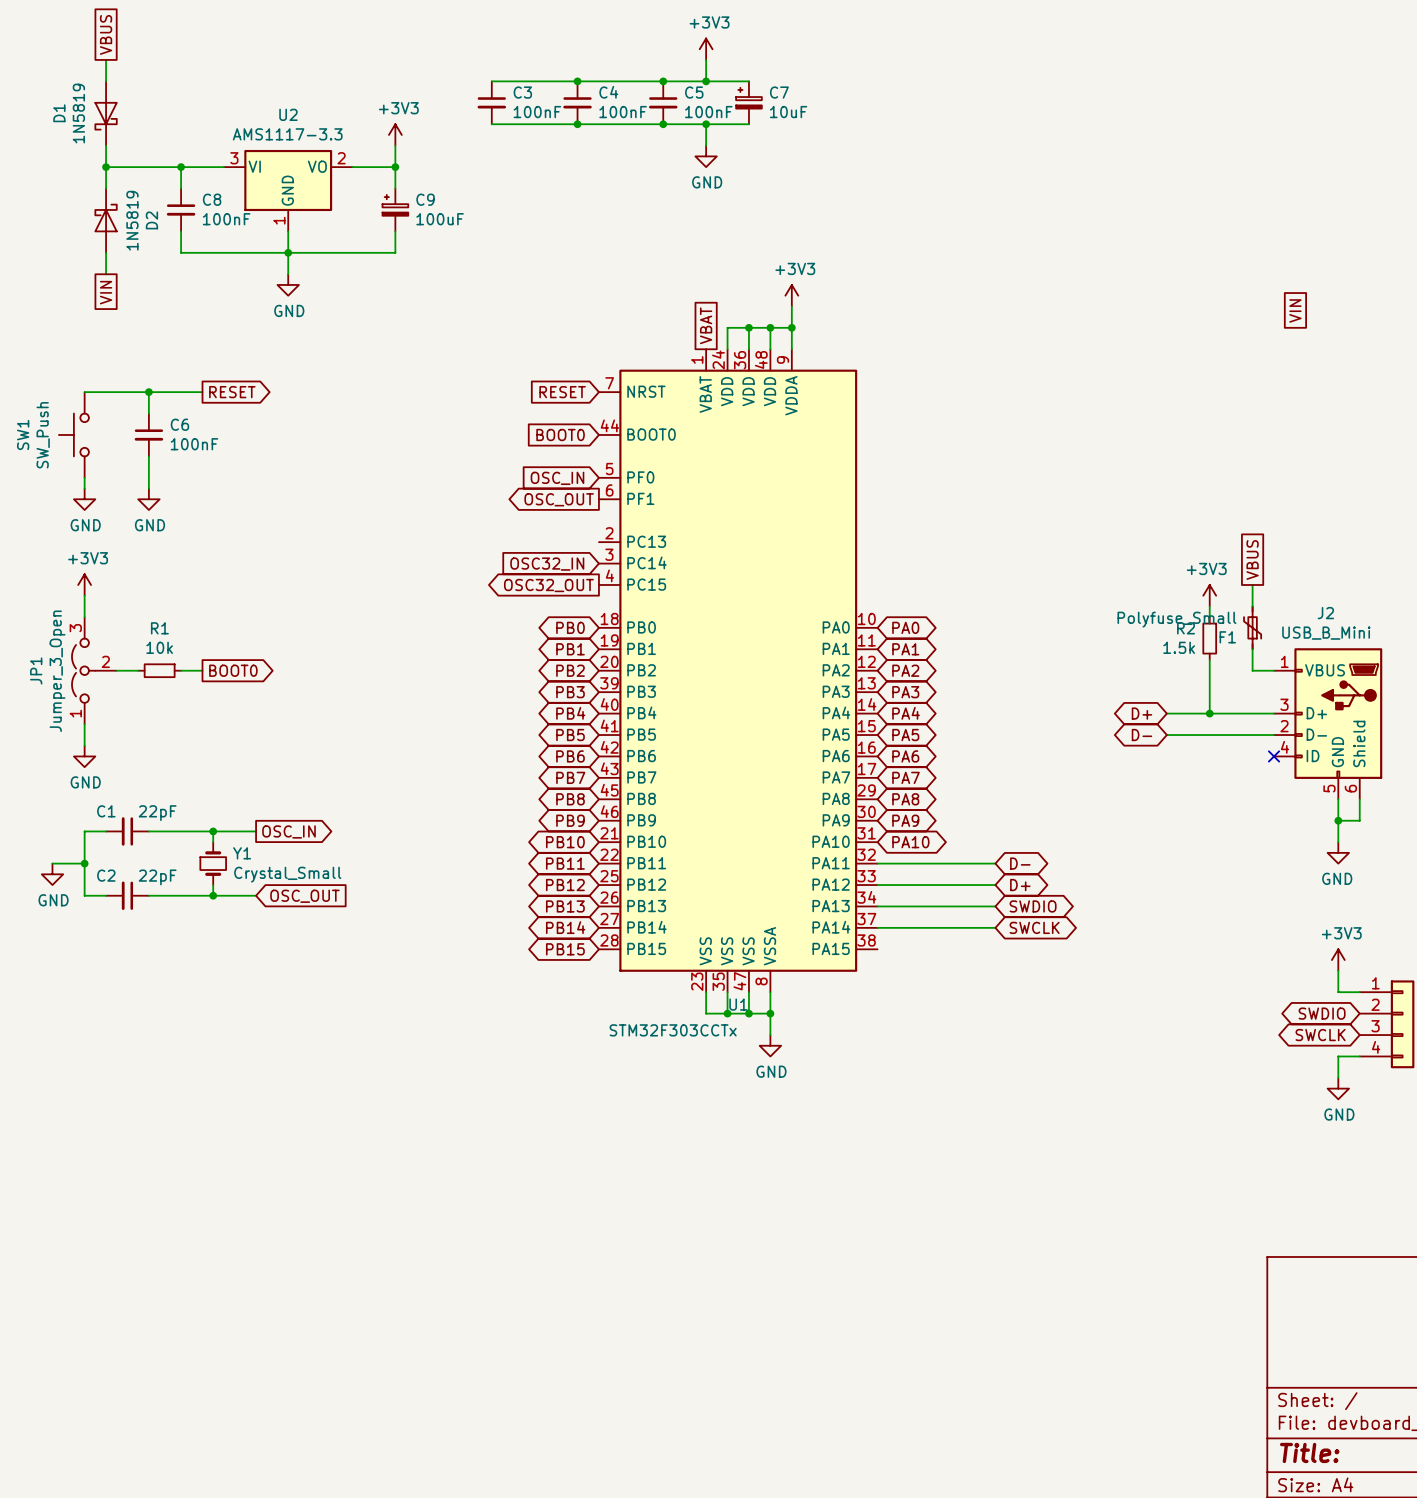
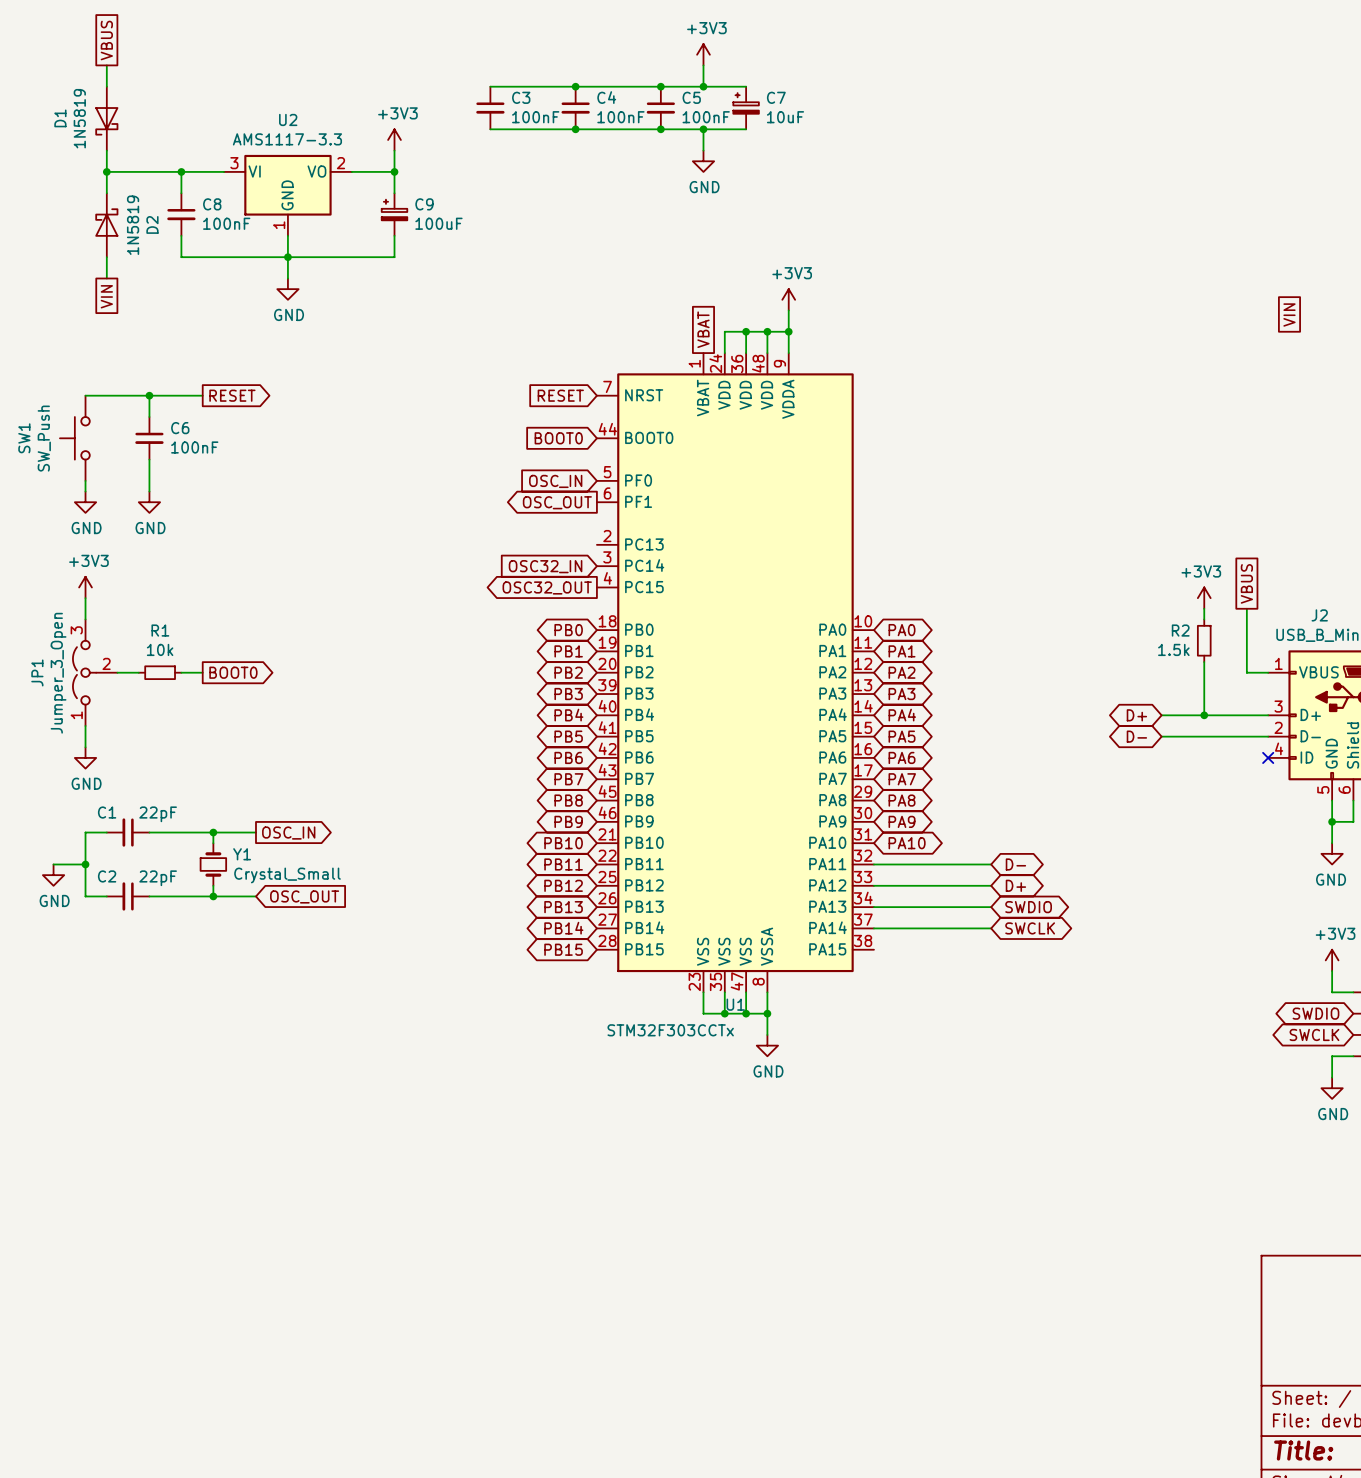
global label position: VBUS (1252, 559) -> VBUS (1246, 583)
F1: Polyfuse_Small (1252, 627) -> none

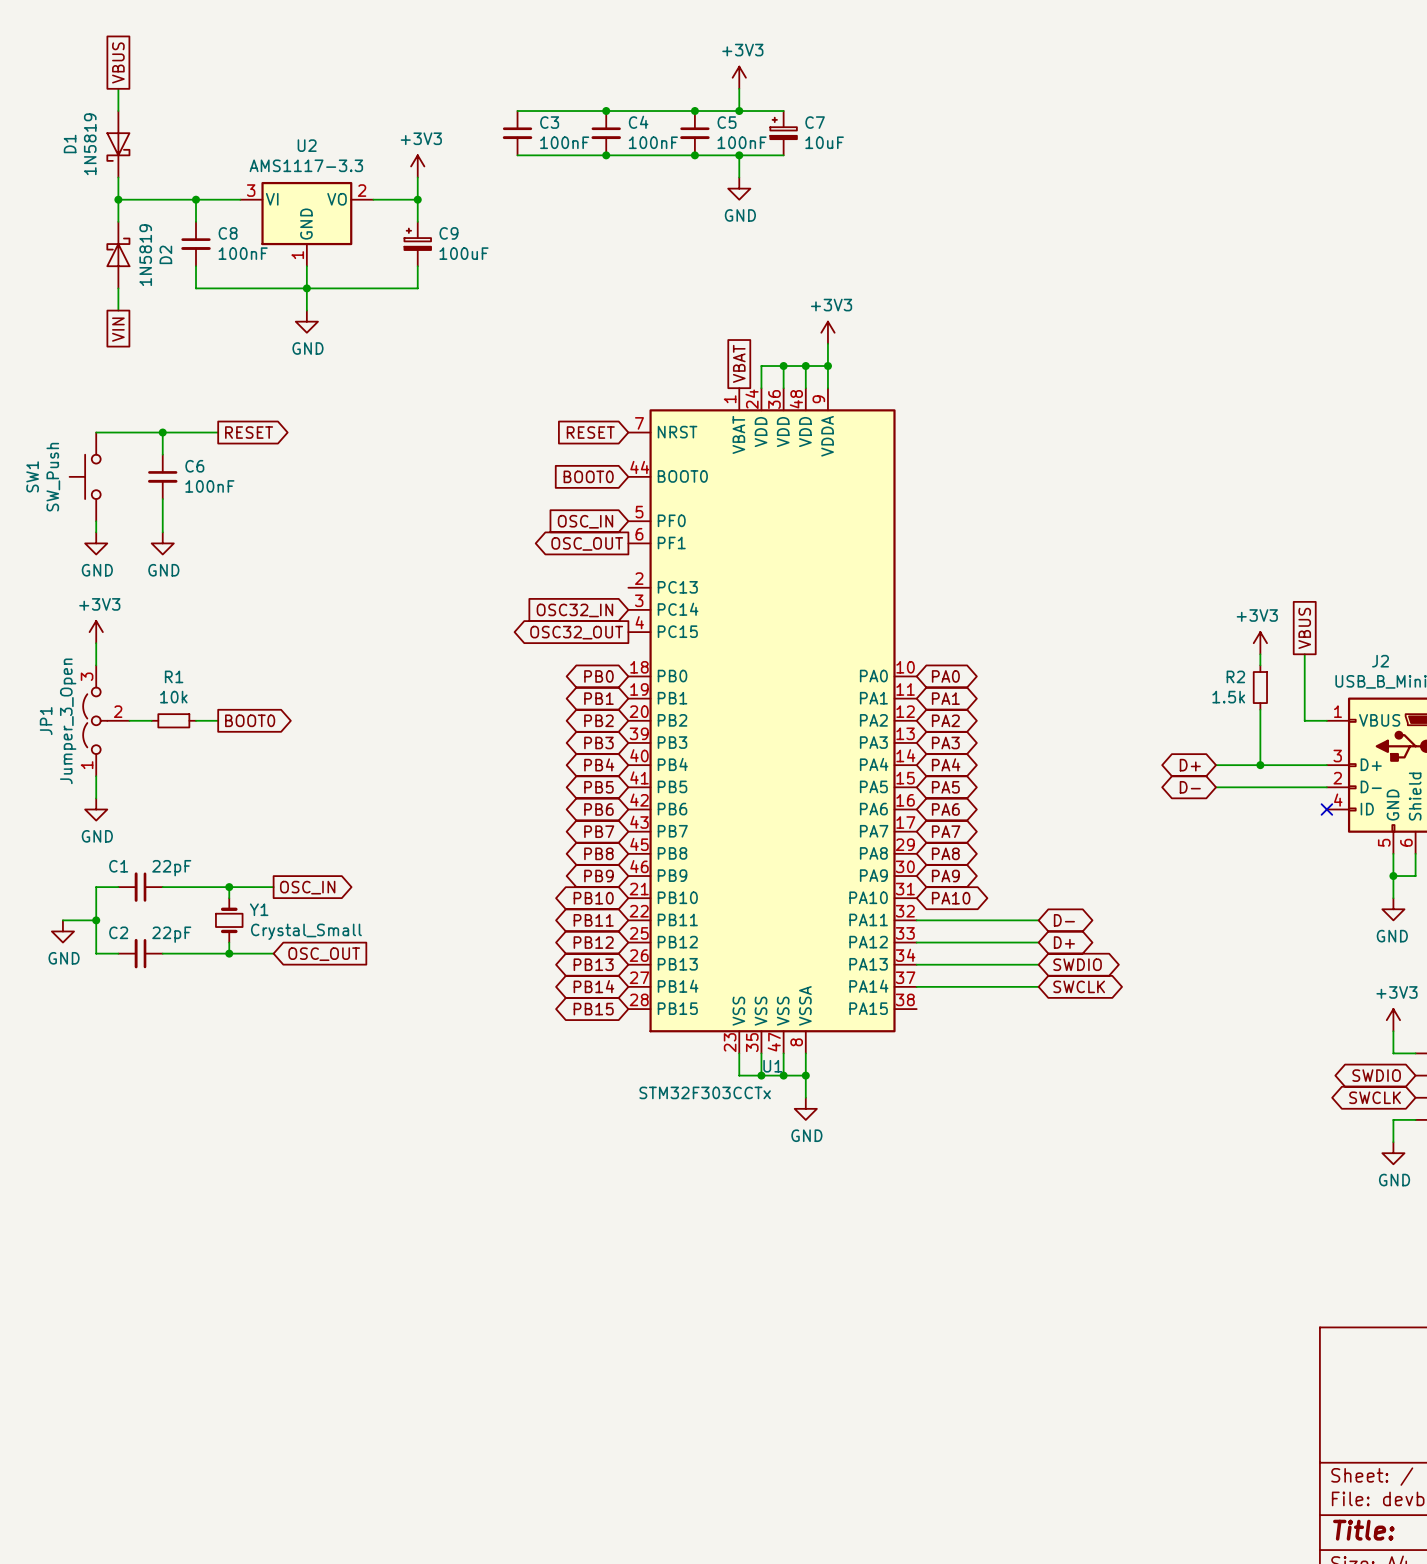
global label: VIN (1289, 315) -> none

